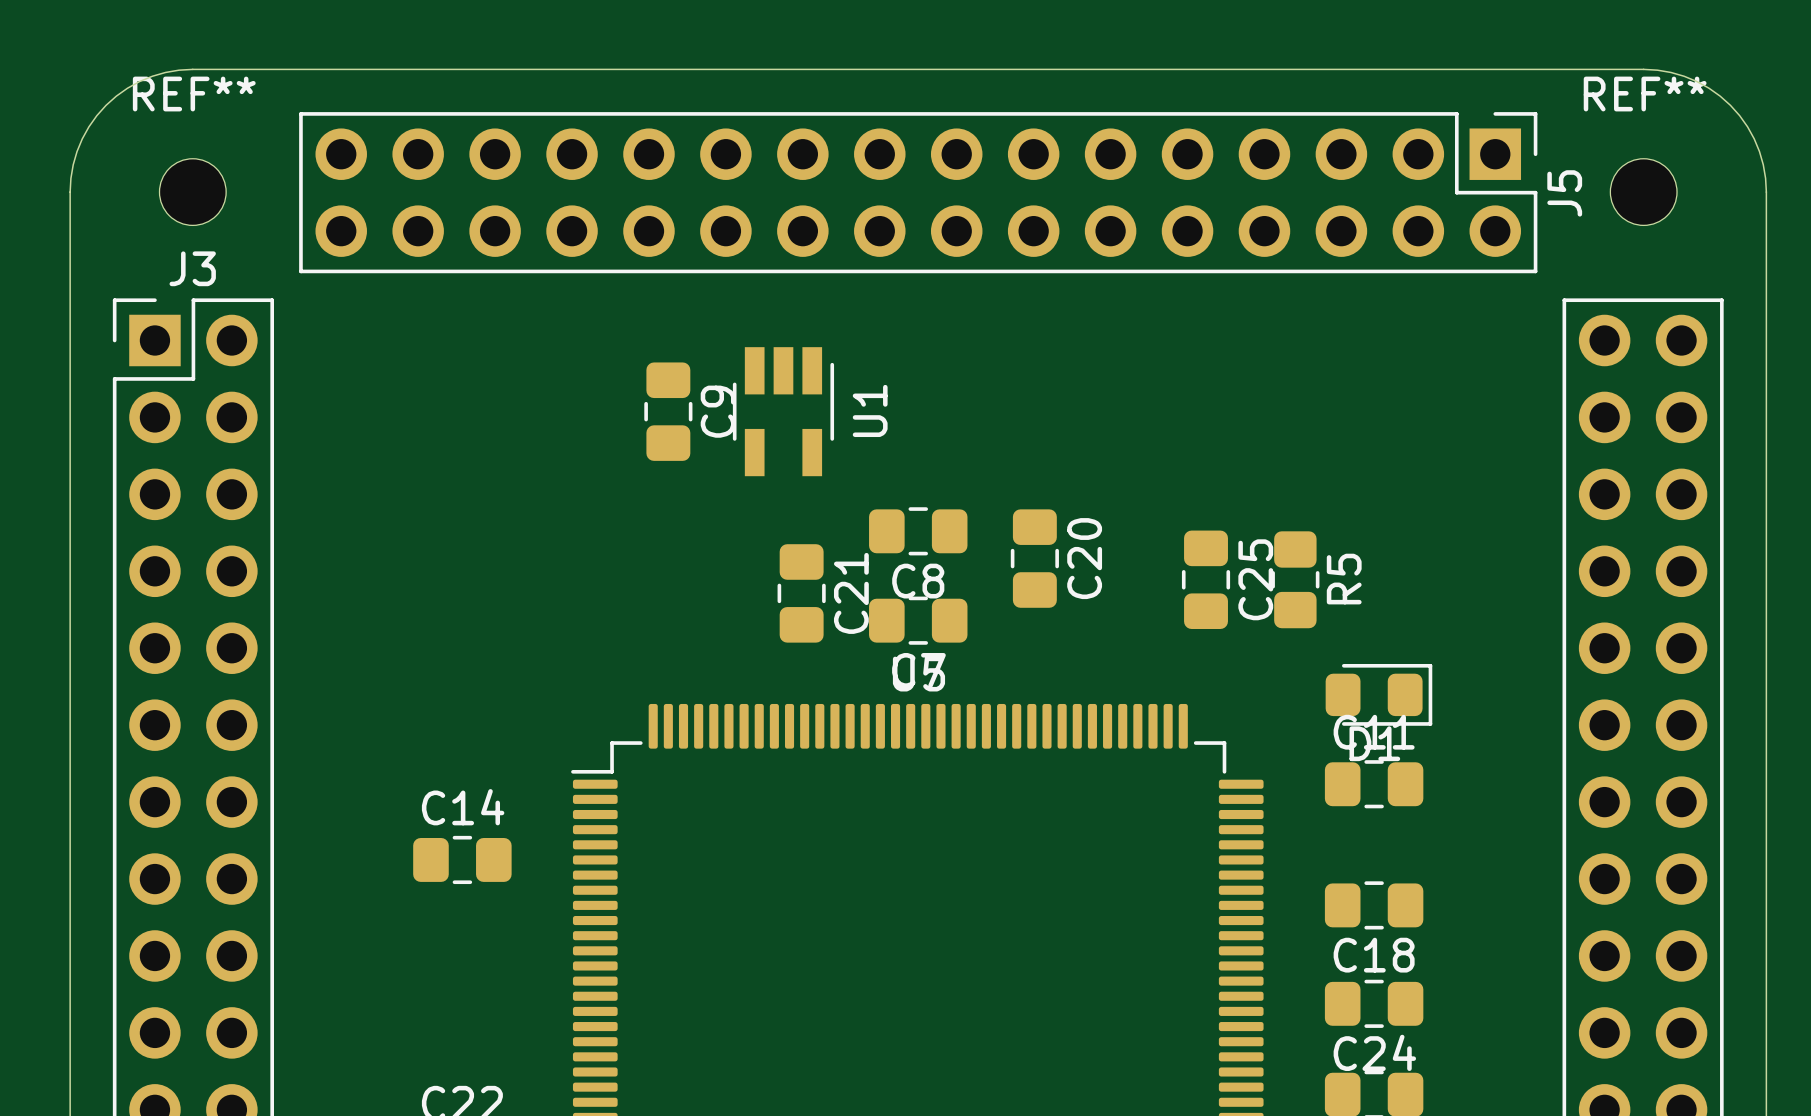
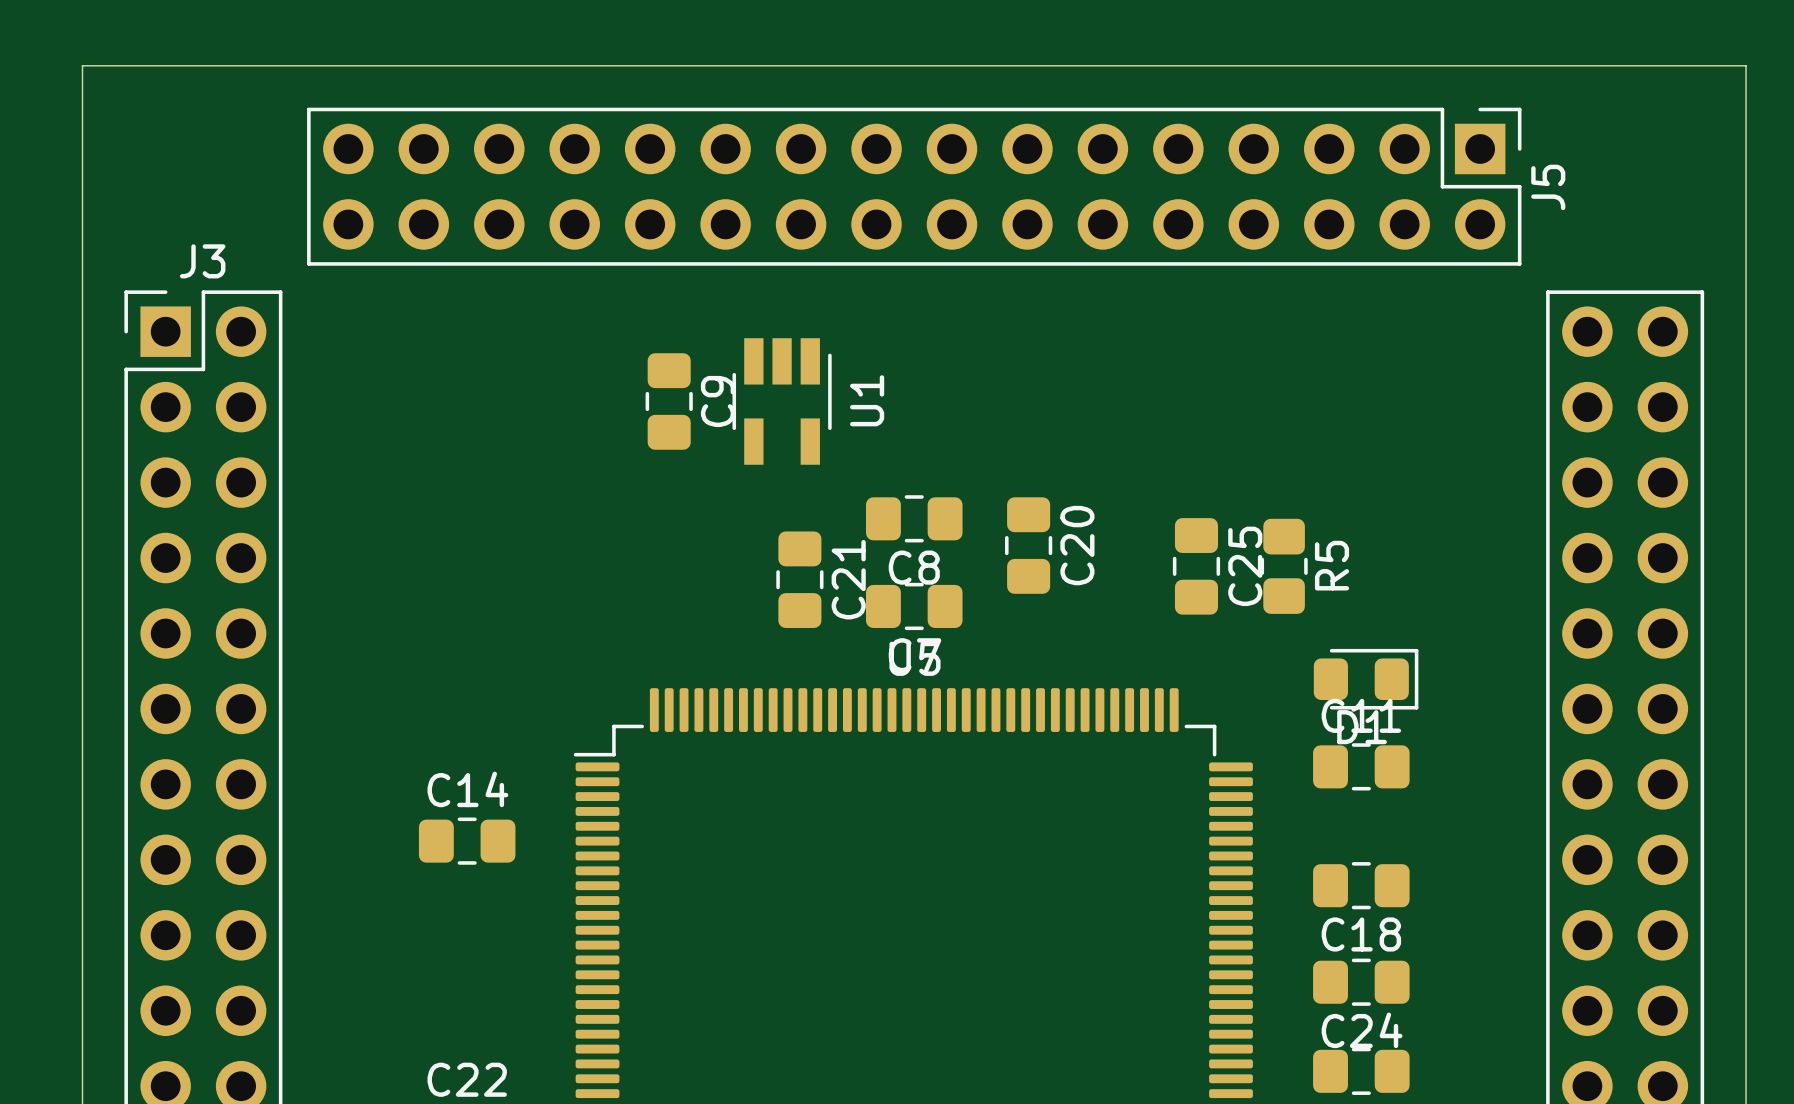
board edge: (192, 69) (165, 72) (139, 81) (116, 96) (106, 105) (88, 126) (77, 151) (73, 164) (70, 192) -> (202, 65) (82, 65) (82, 186)
board edge: (1643, 69) (1670, 72) (1696, 81) (1708, 88) (1730, 105) (1747, 126) (1754, 138) (1763, 164) (1766, 192) -> (1625, 65) (1746, 65) (1746, 186)
REF**: (192, 192) -> none
REF**: (1643, 192) -> none

